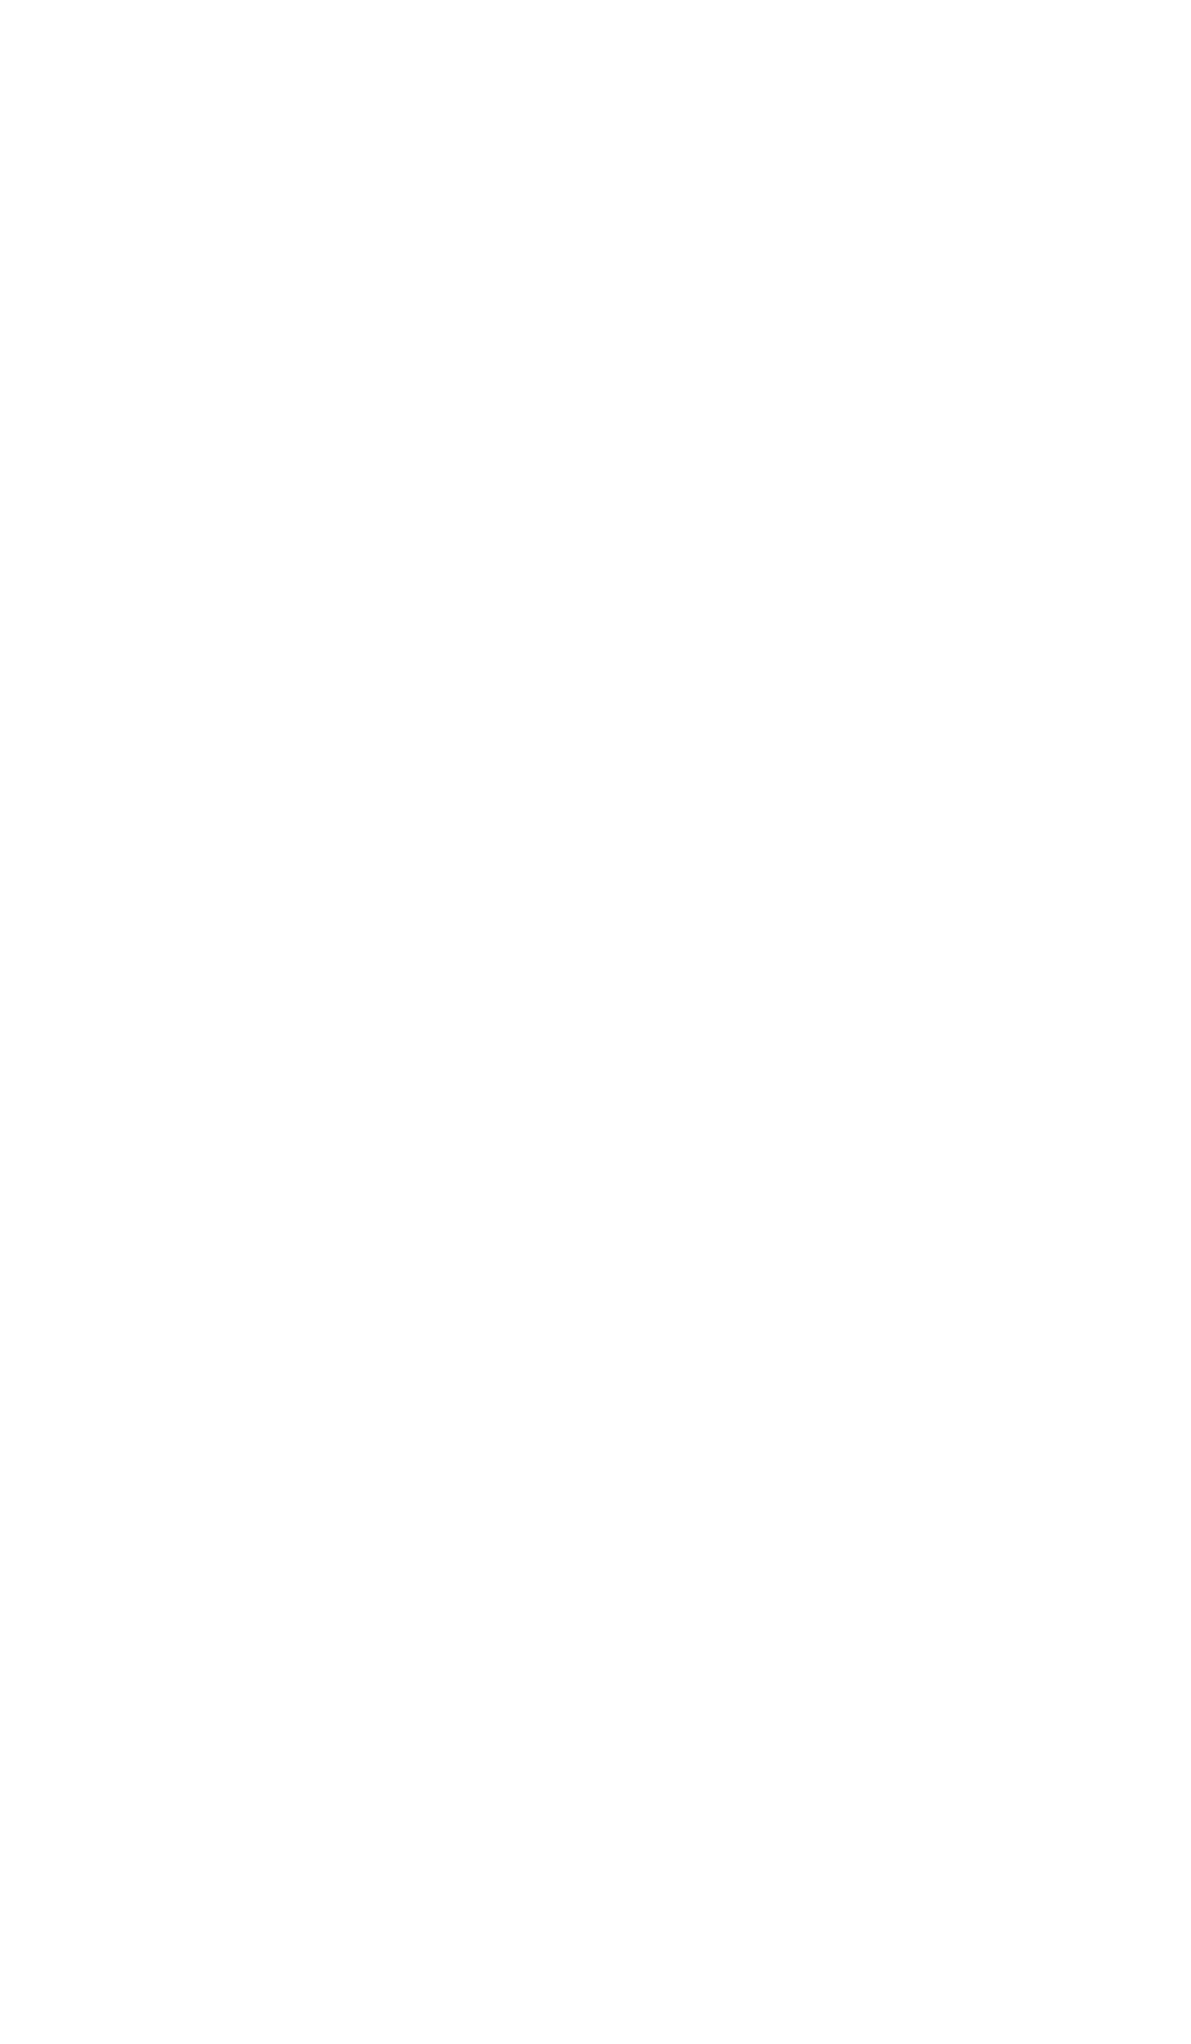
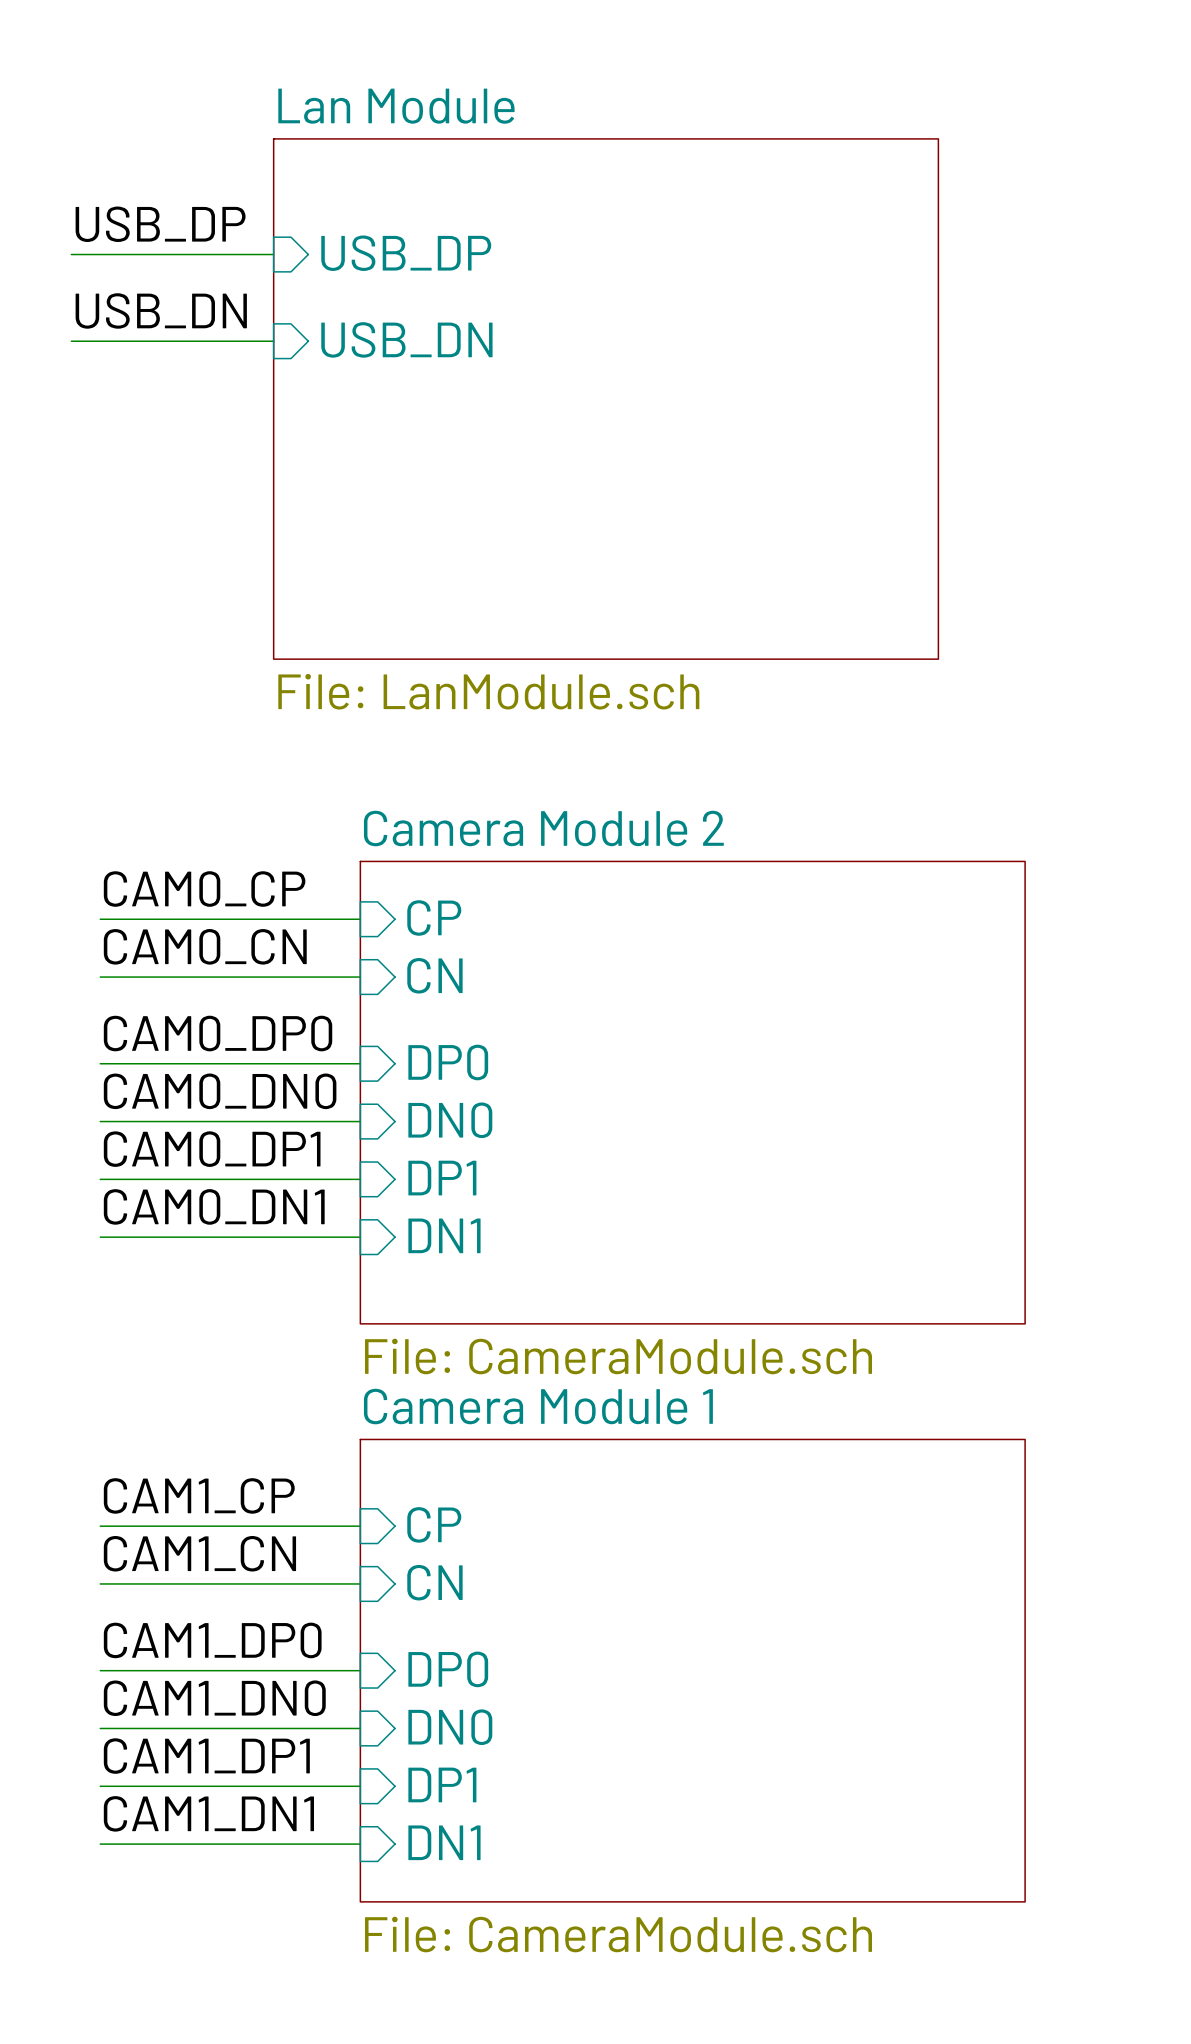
label: none -> USB_DP (160, 224)
sheet pin: none -> USB_DP (406, 253)
wire: none -> (71, 254) (273, 254)
label: none -> USB_DN (161, 310)
sheet pin: none -> USB_DN (406, 339)
wire: none -> (71, 341) (273, 341)
sheet Lan Module: none -> File: LanModule.sch (606, 399)
label: none -> CAM0_CP (204, 889)
sheet pin: none -> CP (434, 917)
wire: none -> (100, 919) (360, 919)
label: none -> CAM0_CN (205, 946)
sheet pin: none -> CN (434, 975)
wire: none -> (100, 977) (360, 977)
label: none -> CAM0_DP0 (218, 1033)
sheet pin: none -> DP0 (448, 1062)
wire: none -> (100, 1063) (360, 1063)
label: none -> CAM0_DN0 (220, 1091)
sheet Camera Module 2: none -> File: CameraModule.sch (692, 1092)
sheet pin: none -> DN0 (450, 1120)
wire: none -> (100, 1121) (360, 1121)
label: none -> CAM0_DP1 (212, 1149)
sheet pin: none -> DP1 (442, 1178)
wire: none -> (100, 1179) (360, 1179)
label: none -> CAM0_DN1 (214, 1206)
sheet pin: none -> DN1 (444, 1235)
wire: none -> (100, 1237) (360, 1237)
label: none -> CAM1_CP (199, 1495)
sheet pin: none -> CP (434, 1524)
wire: none -> (100, 1526) (360, 1526)
label: none -> CAM1_CN (199, 1553)
sheet pin: none -> CN (434, 1582)
wire: none -> (100, 1583) (360, 1583)
label: none -> CAM1_DP0 (212, 1640)
sheet pin: none -> DP0 (448, 1669)
wire: none -> (100, 1670) (360, 1670)
sheet Camera Module 1: none -> File: CameraModule.sch (692, 1670)
label: none -> CAM1_DN0 (214, 1698)
sheet pin: none -> DN0 (450, 1727)
wire: none -> (100, 1728) (360, 1728)
label: none -> CAM1_DP1 (206, 1756)
sheet pin: none -> DP1 (442, 1784)
wire: none -> (100, 1786) (360, 1786)
label: none -> CAM1_DN1 (208, 1813)
sheet pin: none -> DN1 (444, 1842)
wire: none -> (100, 1844) (360, 1844)

